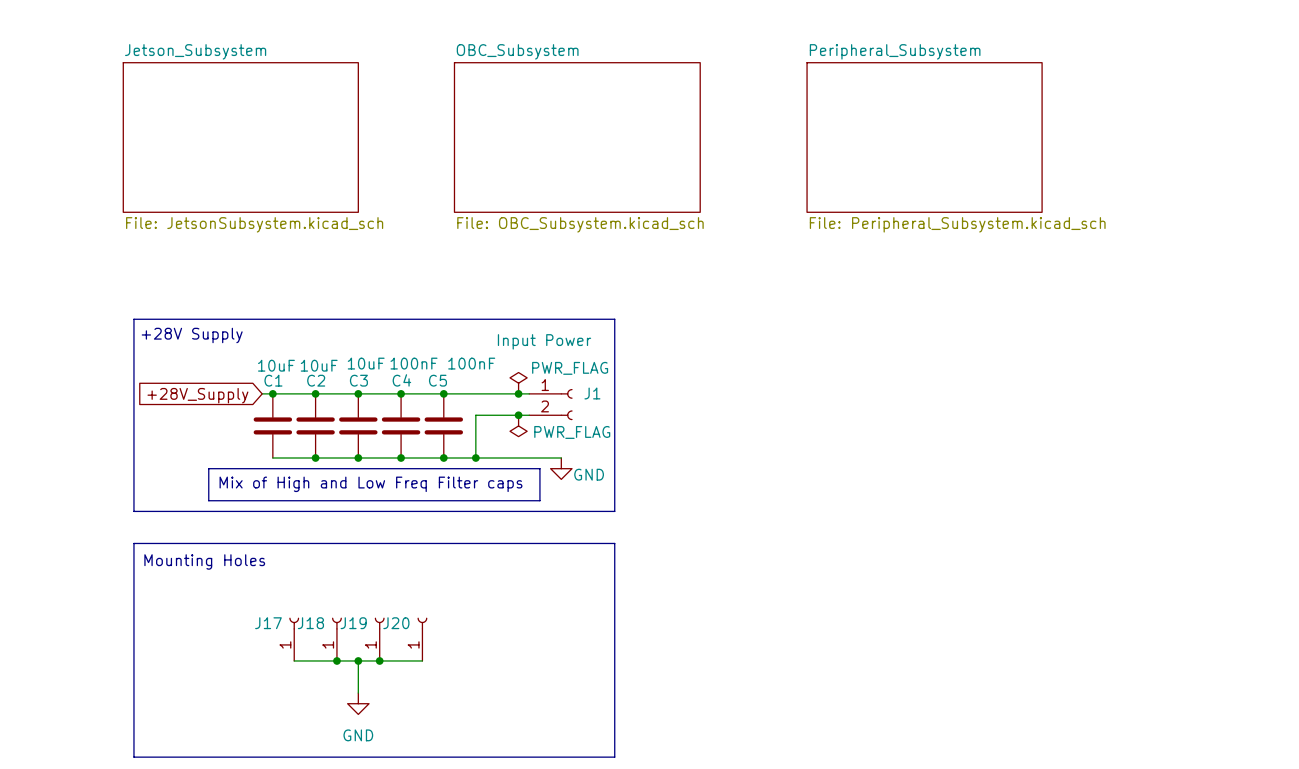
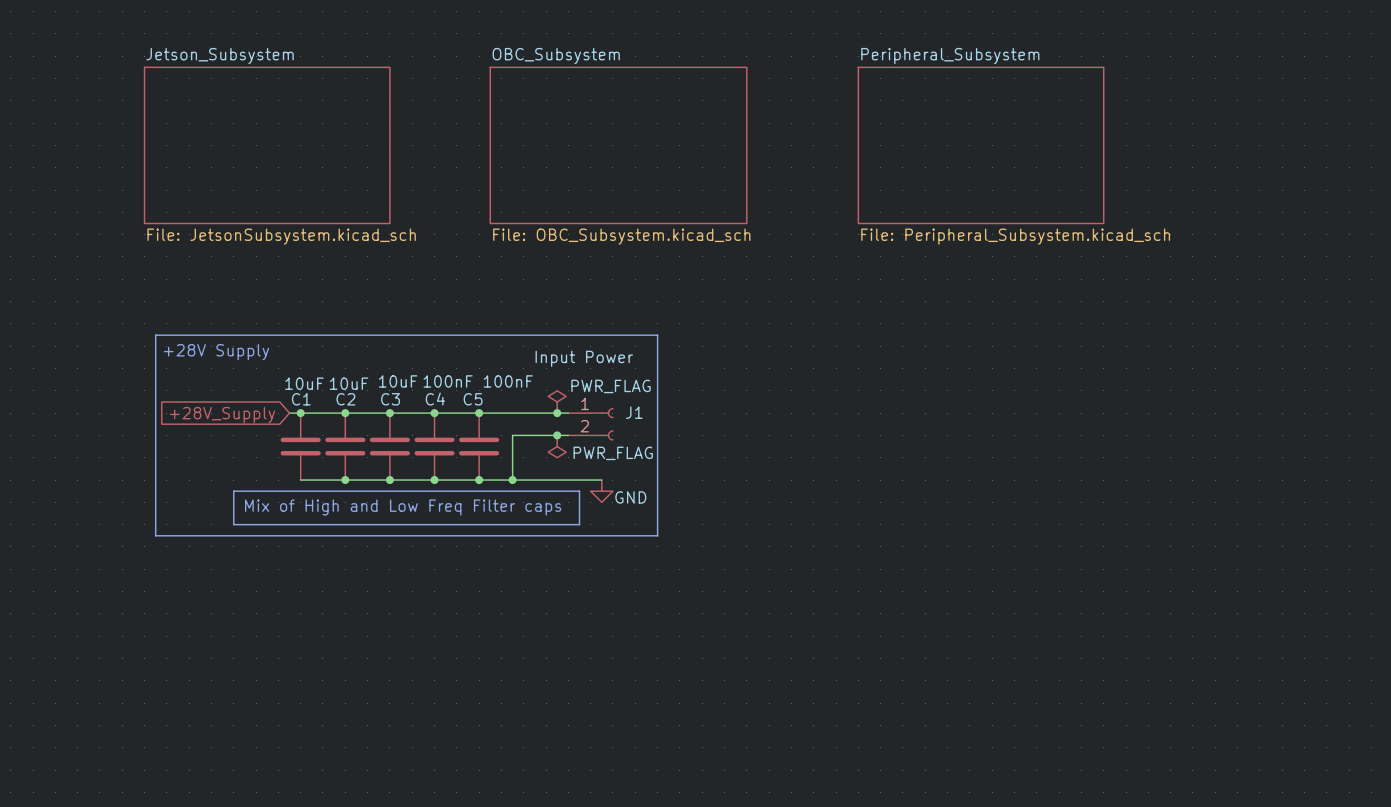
line: (133, 543) (614, 543) (614, 757) (133, 757) (133, 543) -> none
text: Mounting Holes (204, 561) -> none
J17: (294, 639) -> none
J18: (336, 639) -> none
J19: (379, 639) -> none
J20: (422, 639) -> none
wire: (294, 660) (422, 660) -> none
junction: (336, 660) -> none
wire: (358, 660) (358, 693) -> none
junction: (358, 660) -> none
junction: (379, 660) -> none
power symbol: GND (358, 703) -> none

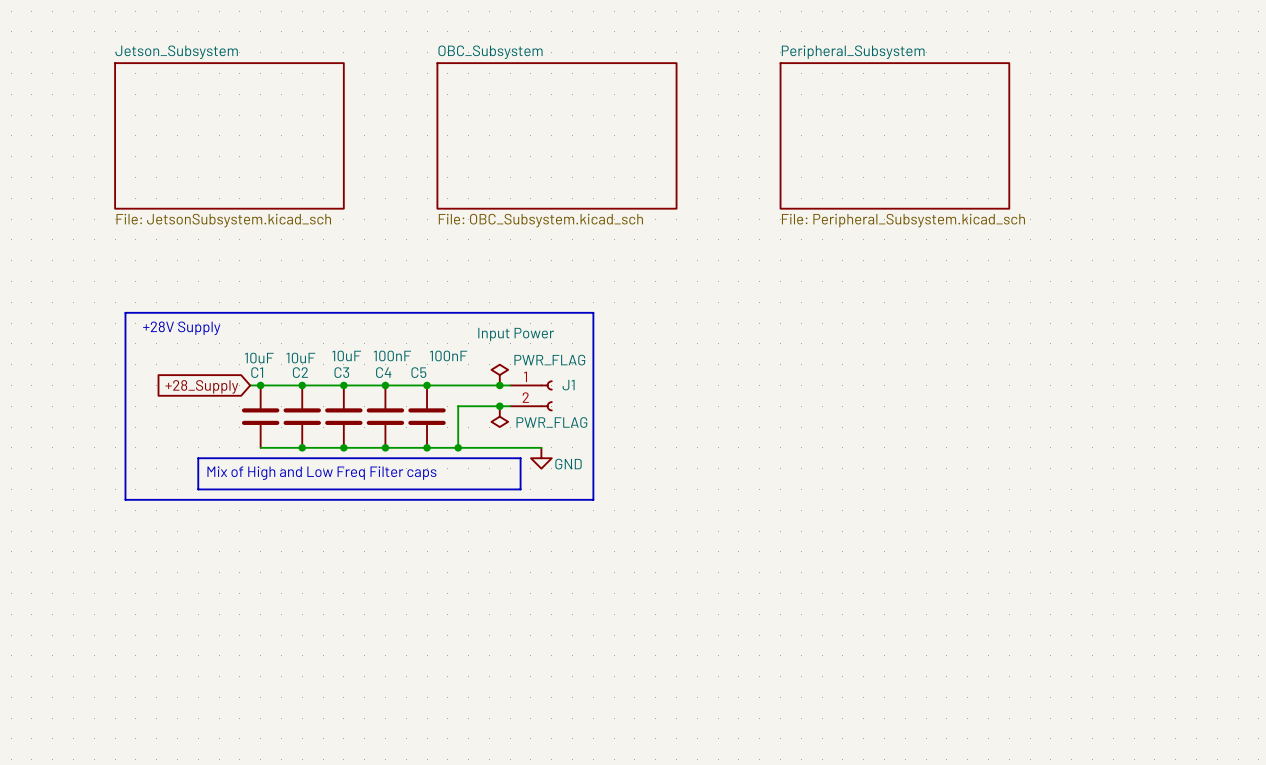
global label: +28V_Supply (222, 414) -> +28_Supply (201, 386)

